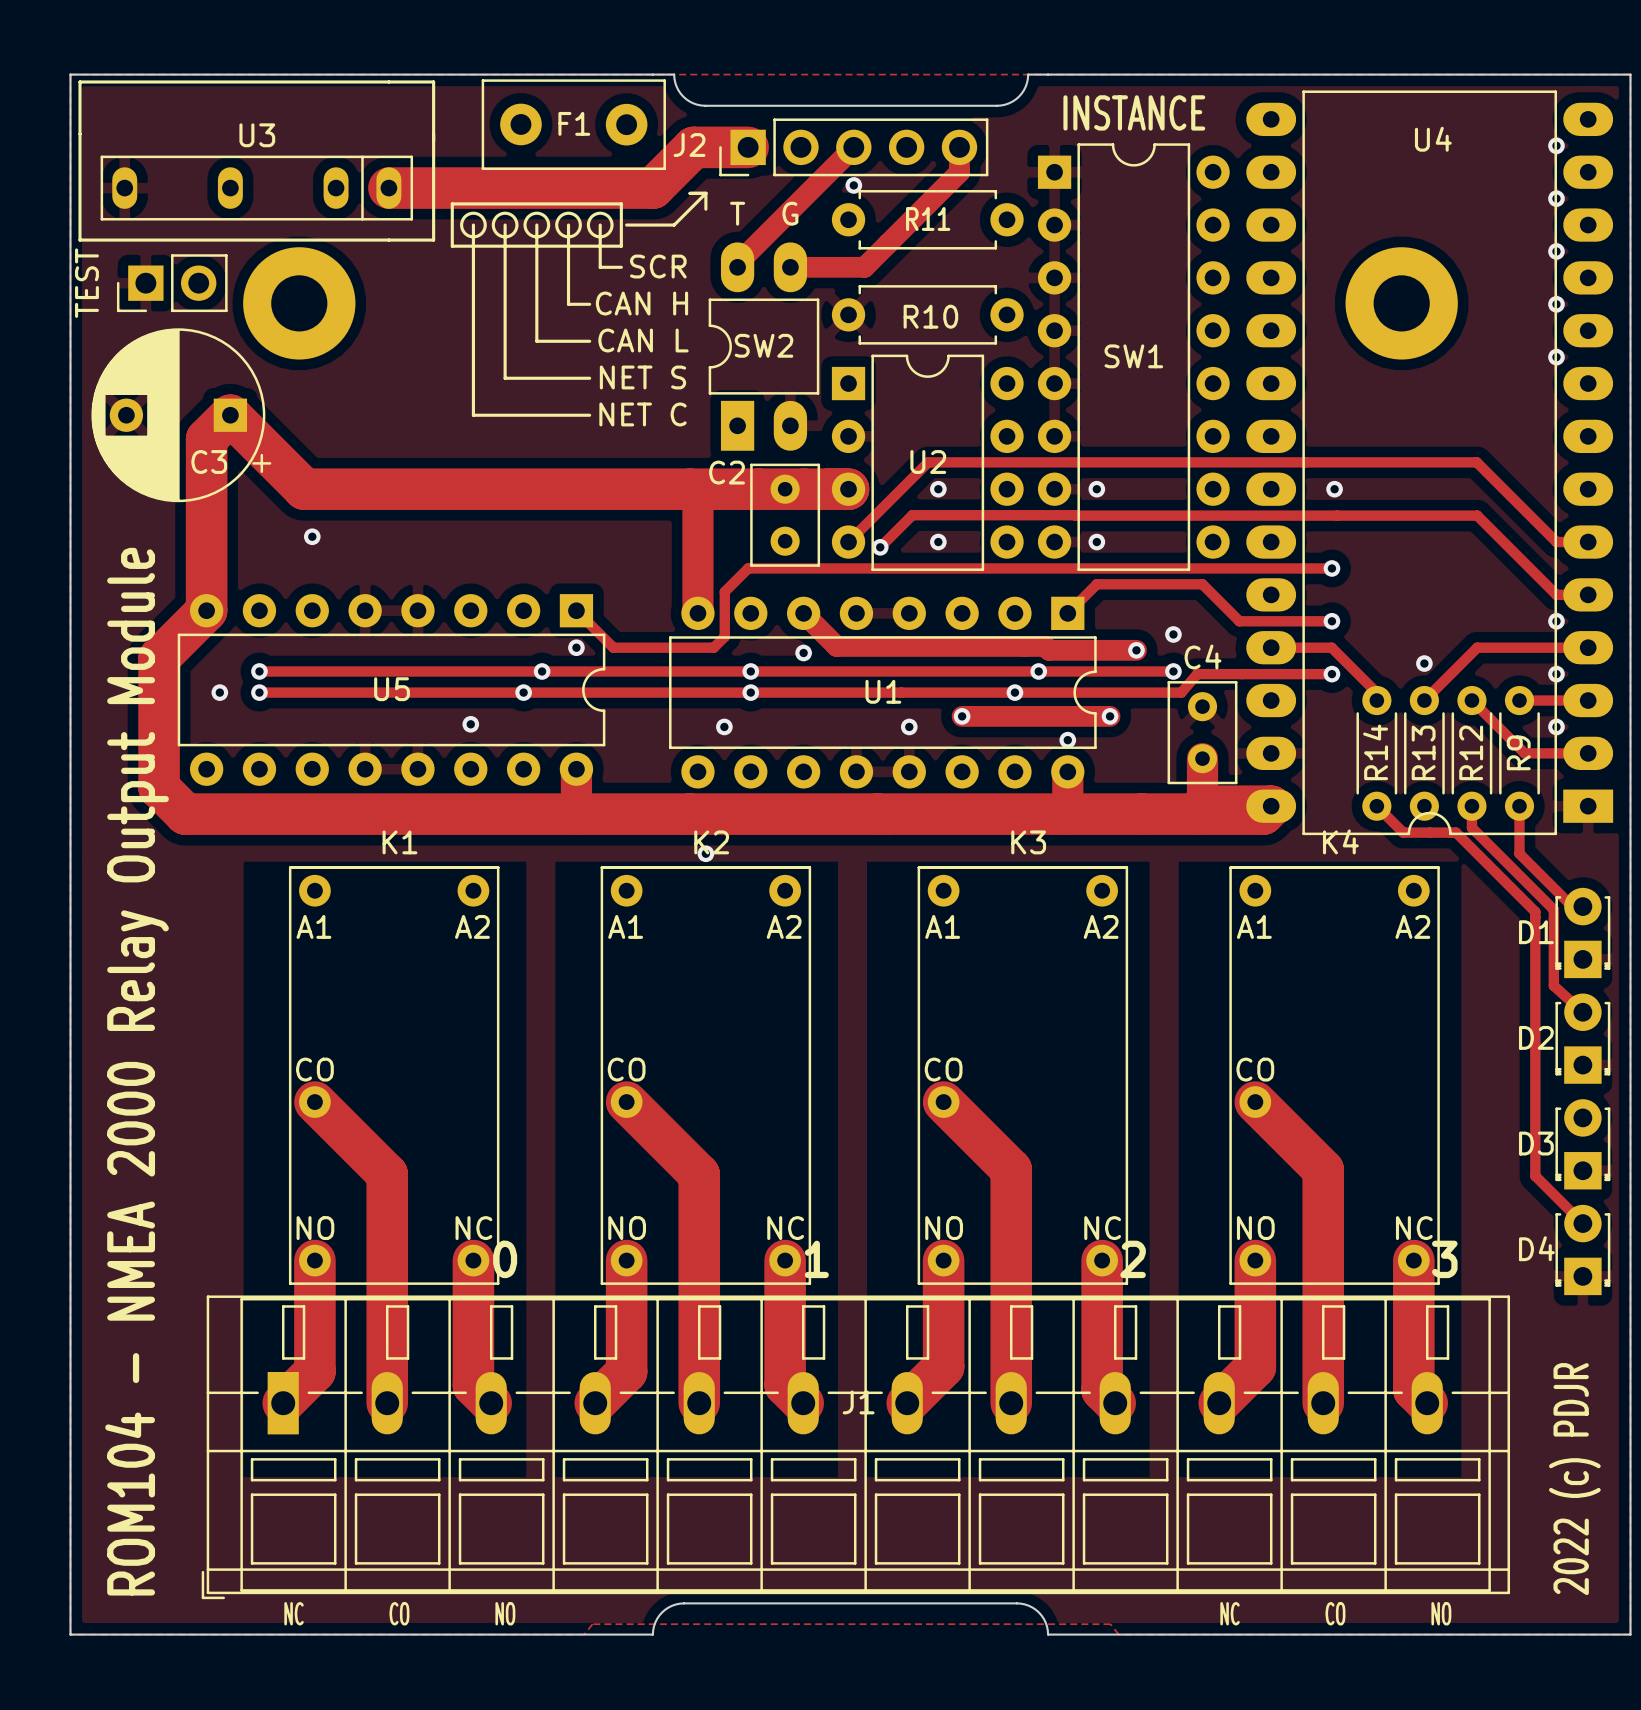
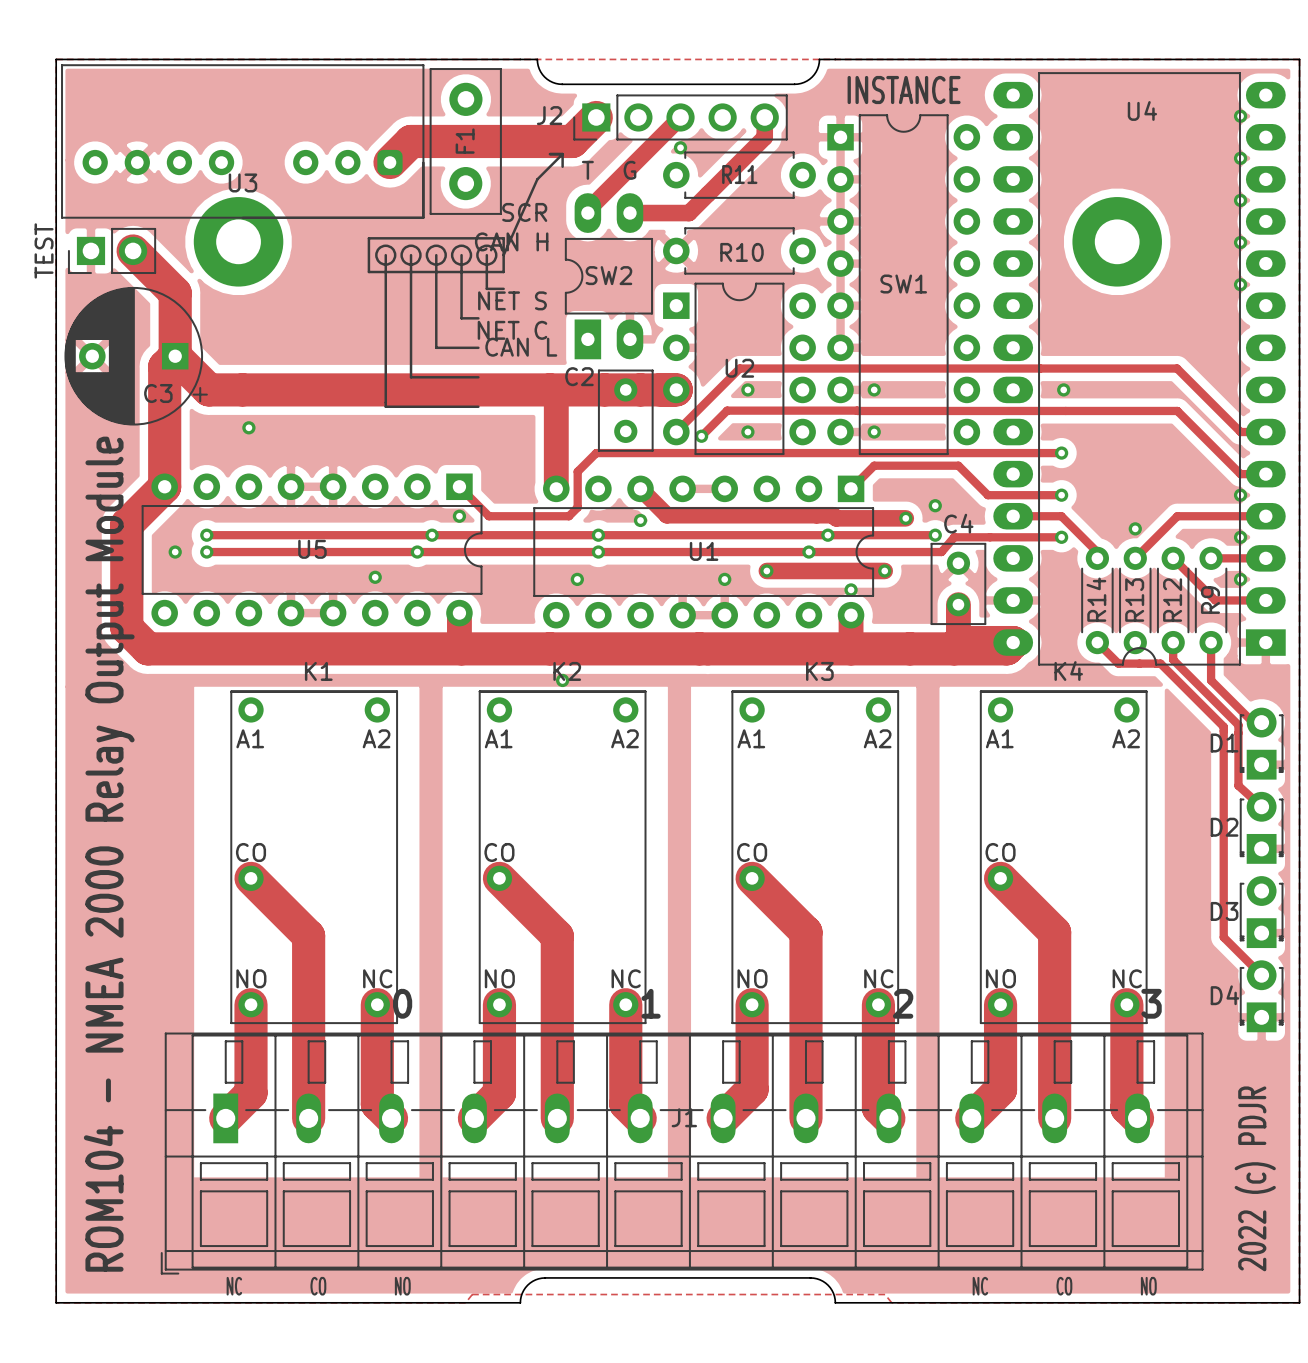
U3 footprint: [78, 80, 436, 242] -> [61, 64, 425, 219]
F1 rotation: 0° (573, 124) -> 90° clockwise (465, 141)
U3 name position: U3 (257, 135) -> U3 (242, 182)
track: (748, 147) (693, 147) (653, 188) (388, 188) -> (596, 117) (572, 141) (411, 141) (389, 162)
line: (452, 203) (452, 246) (621, 246) (621, 203) (452, 203) -> none
drawing: [460, 211, 614, 239] -> none
line: (473, 225) (473, 415) (589, 415) -> (385, 255) (385, 406) (478, 406)
line: (505, 225) (505, 378) (589, 378) -> (411, 255) (411, 377) (478, 377)
line: (536, 225) (536, 341) -> (469, 272) (503, 272) (503, 238) (368, 238) (368, 272) (427, 272)
line: (568, 225) (568, 304) (589, 304) -> (461, 255) (461, 318) (478, 318)
line: (600, 225) (600, 267) (621, 267) -> (486, 255) (486, 288) (503, 288)
line: (626, 225) (674, 225) -> (503, 255) (537, 179)
TEST position: (172, 283) -> (112, 250)
drawing: none -> [375, 244, 498, 266]
track: none -> (133, 250) (175, 293) (175, 356)
line: none -> (436, 255) (436, 347) (478, 347)
text position: CAN L (643, 340) -> CAN L (521, 347)
C3 position: (181, 415) -> (136, 356)
track: (206, 460) (206, 439) (230, 415) (304, 489) -> (175, 356) (208, 389) (242, 389)

